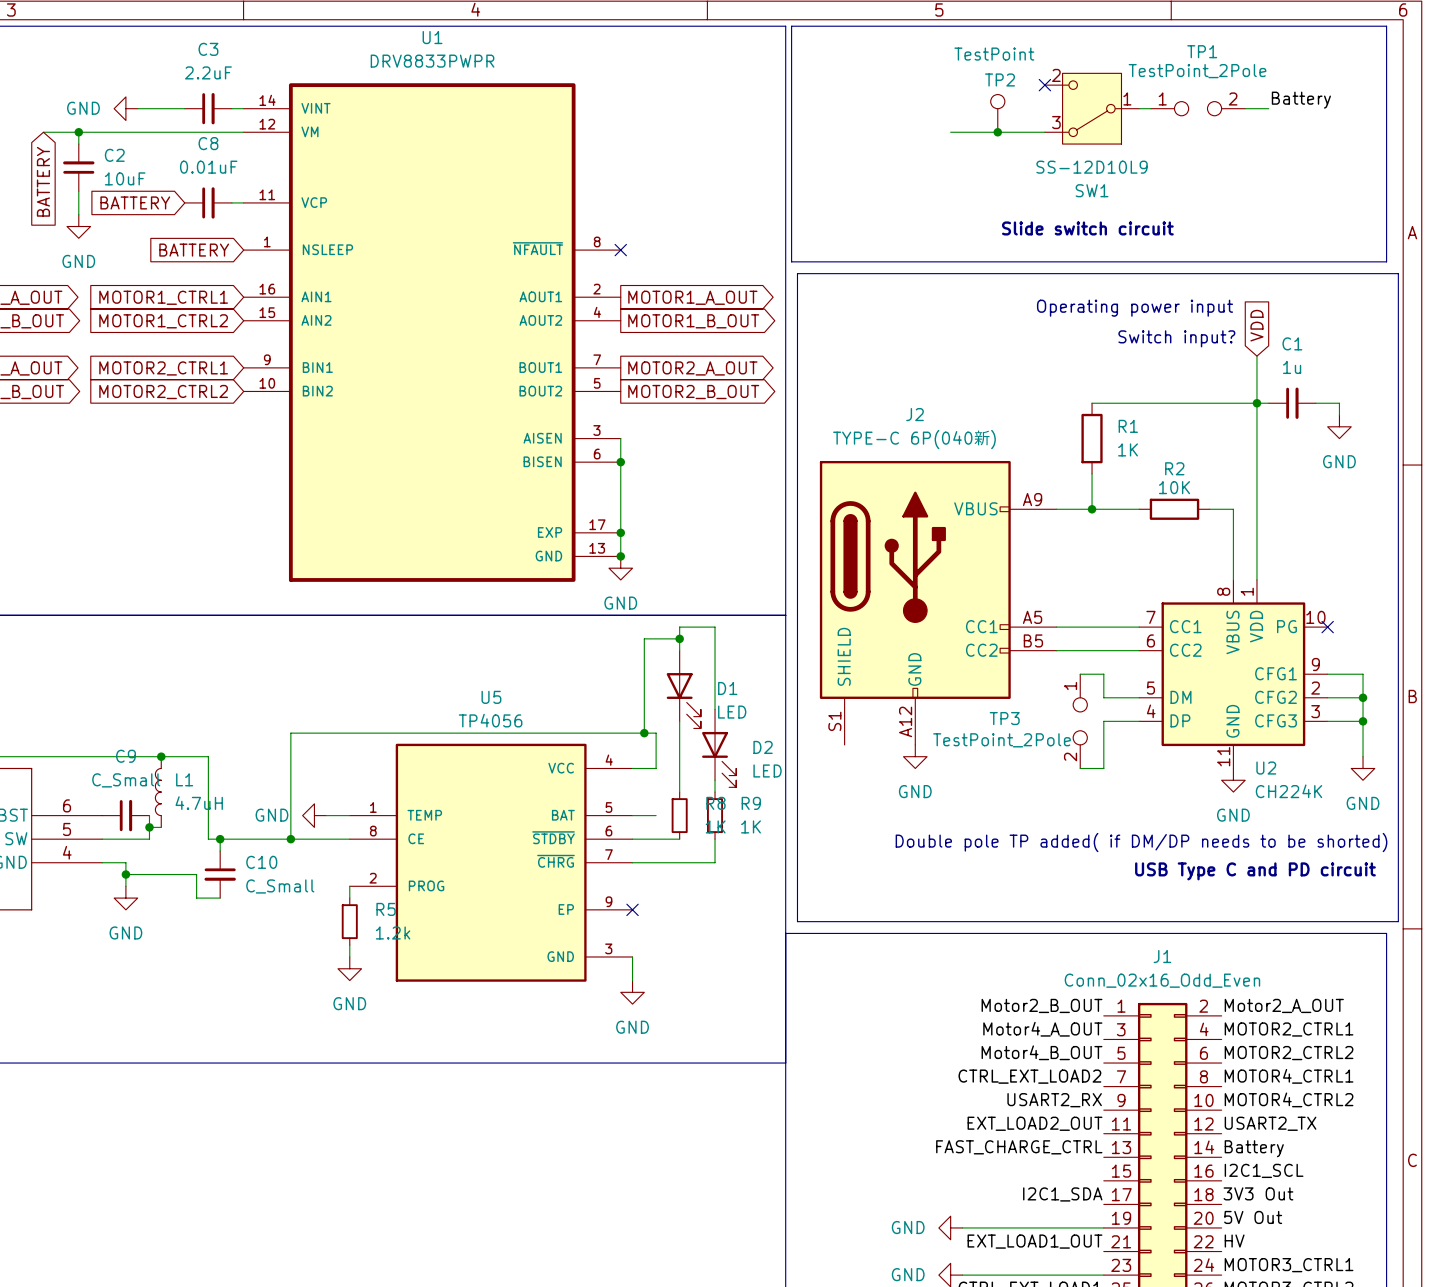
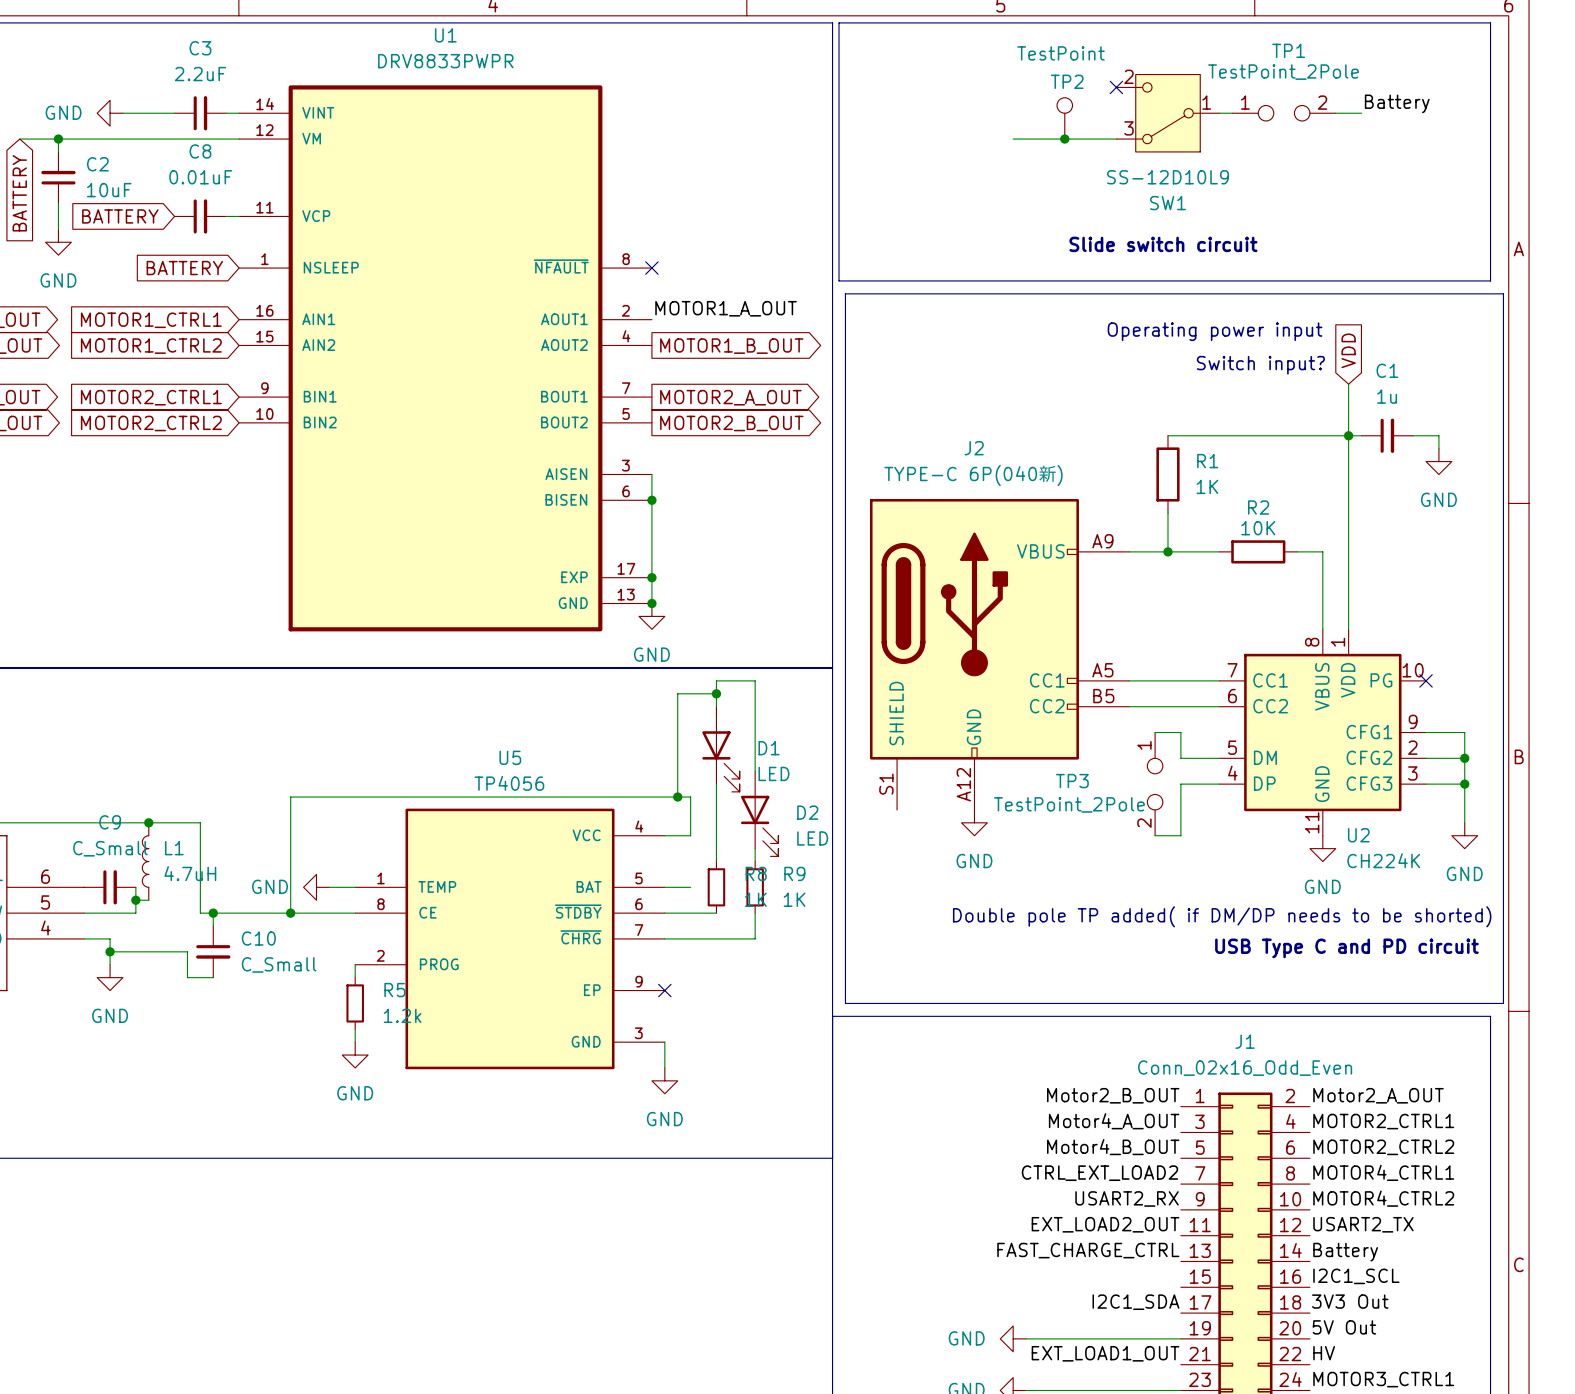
label: none -> MOTOR1_A_OUT (726, 308)
global label: MOTOR1_A_OUT (692, 297) -> none

